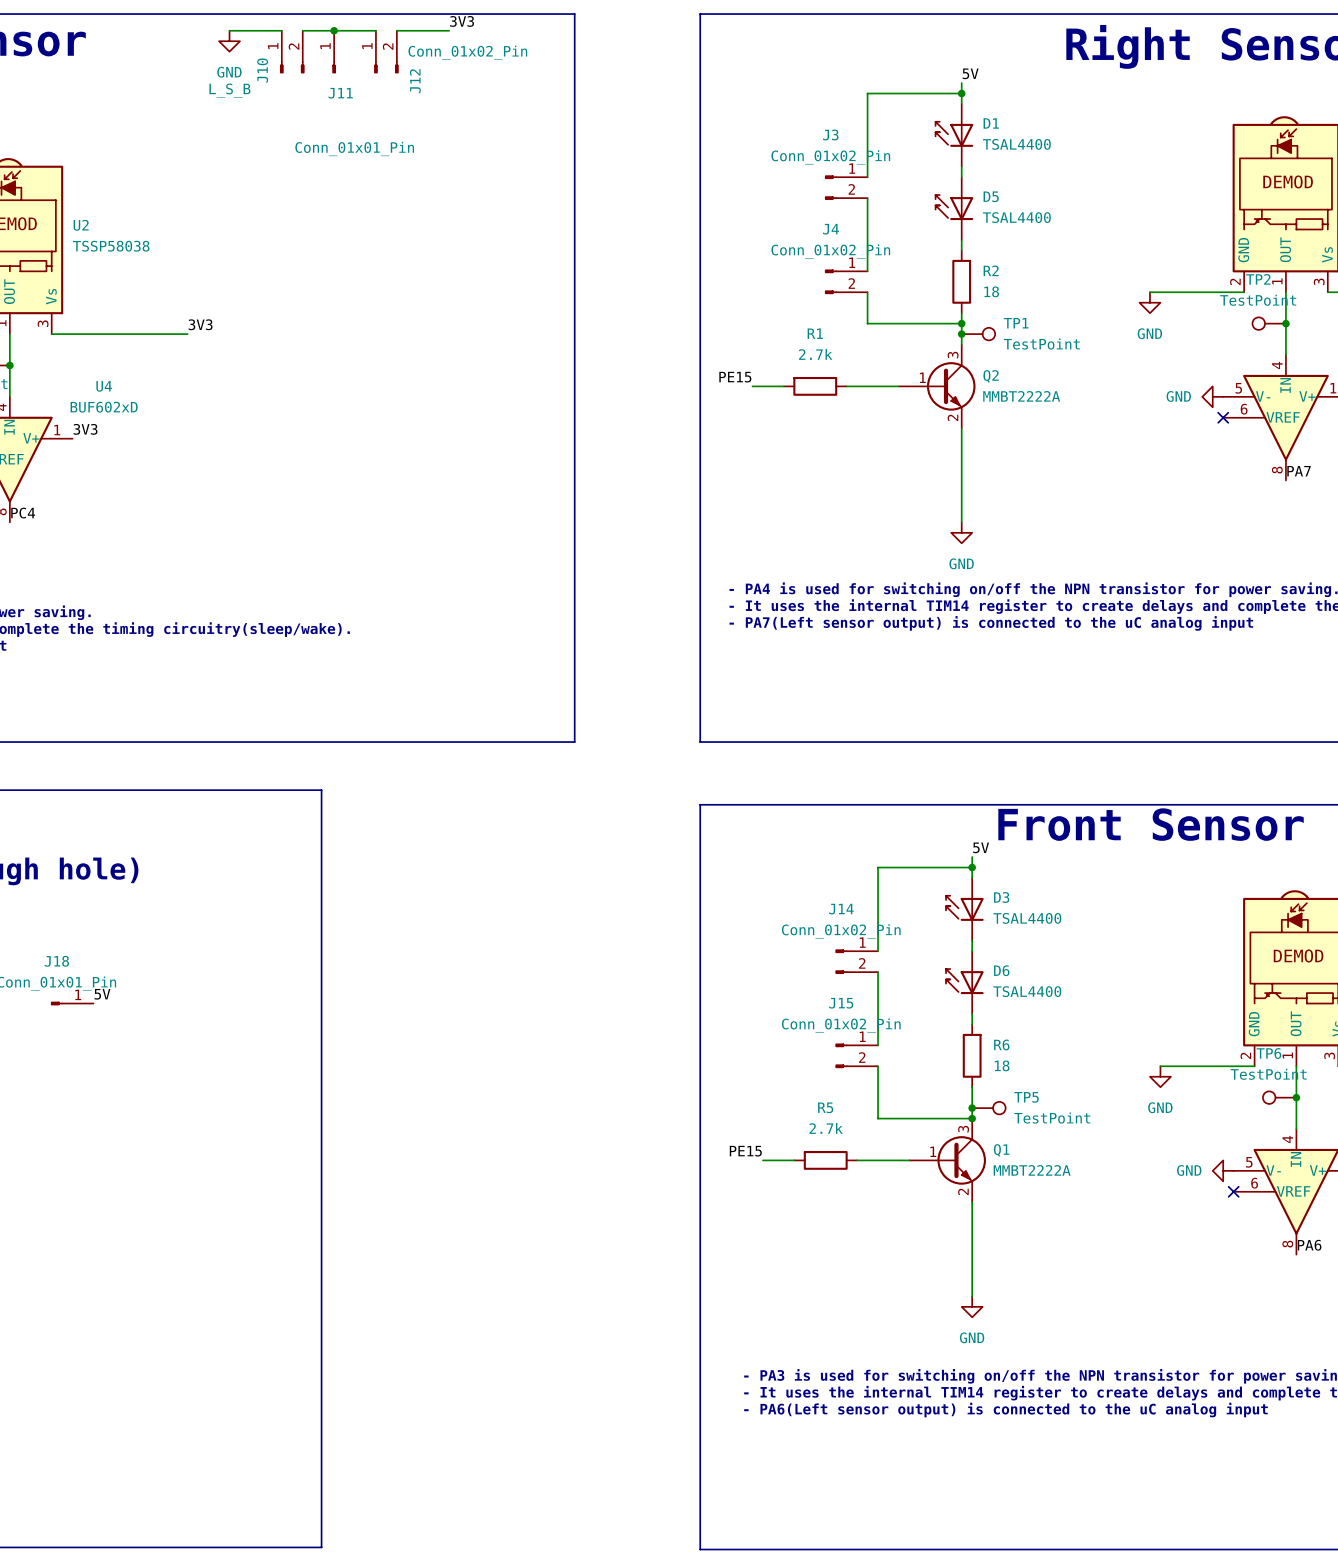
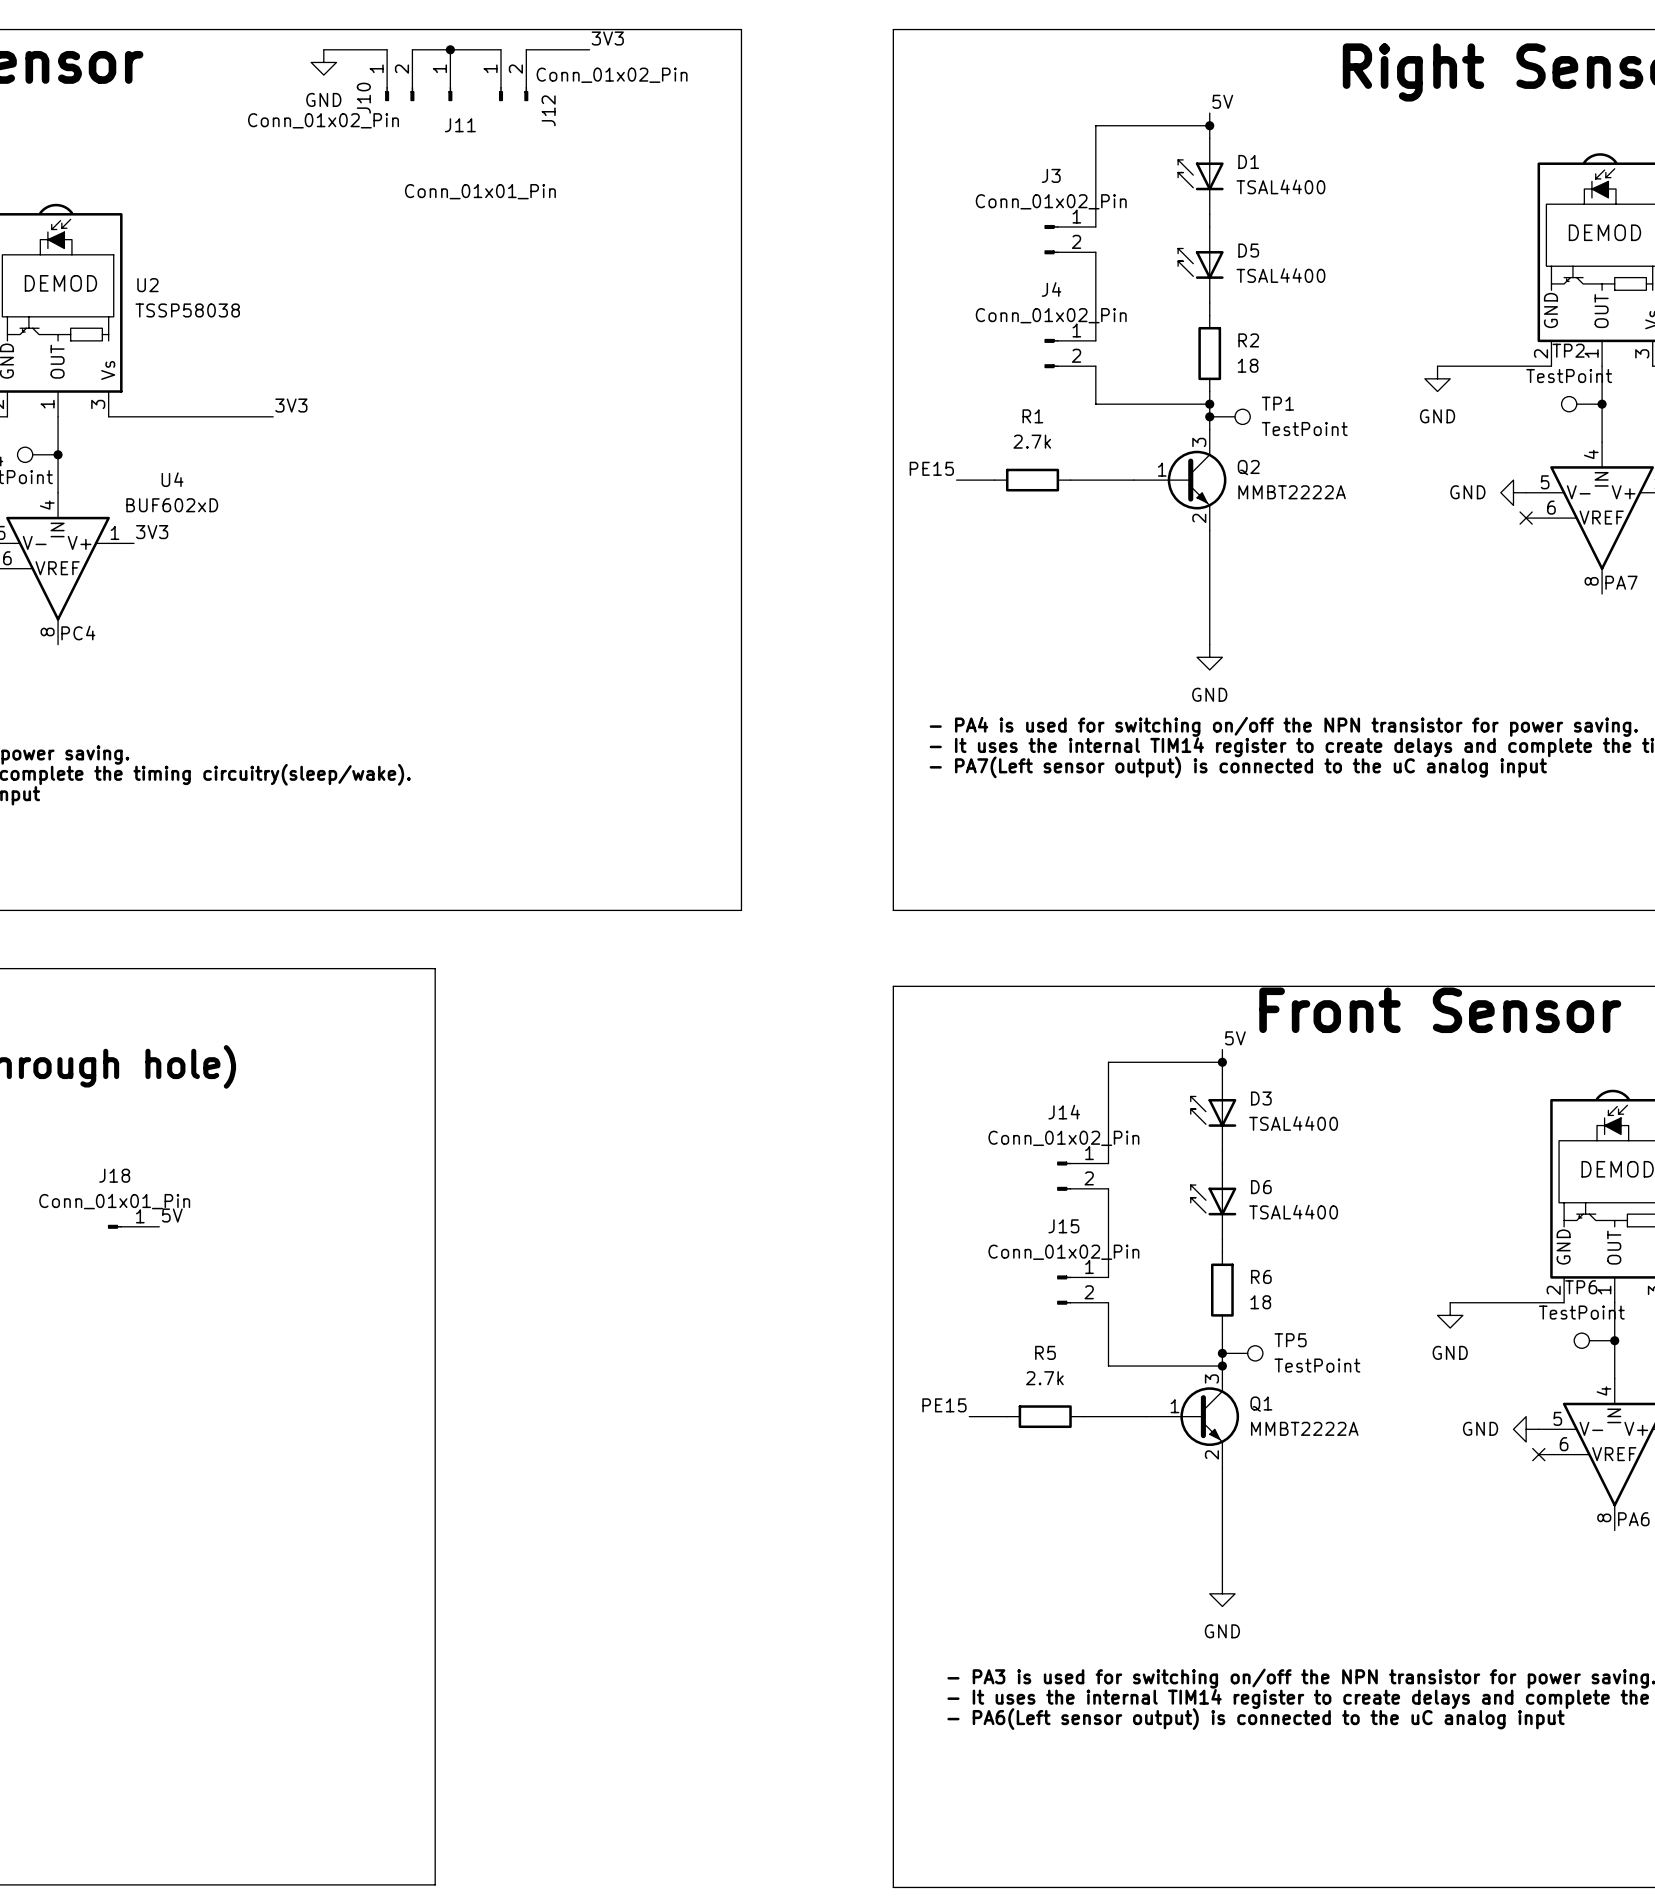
J10 value: L_S_B (229, 90) -> Conn_01x02_Pin (323, 120)

